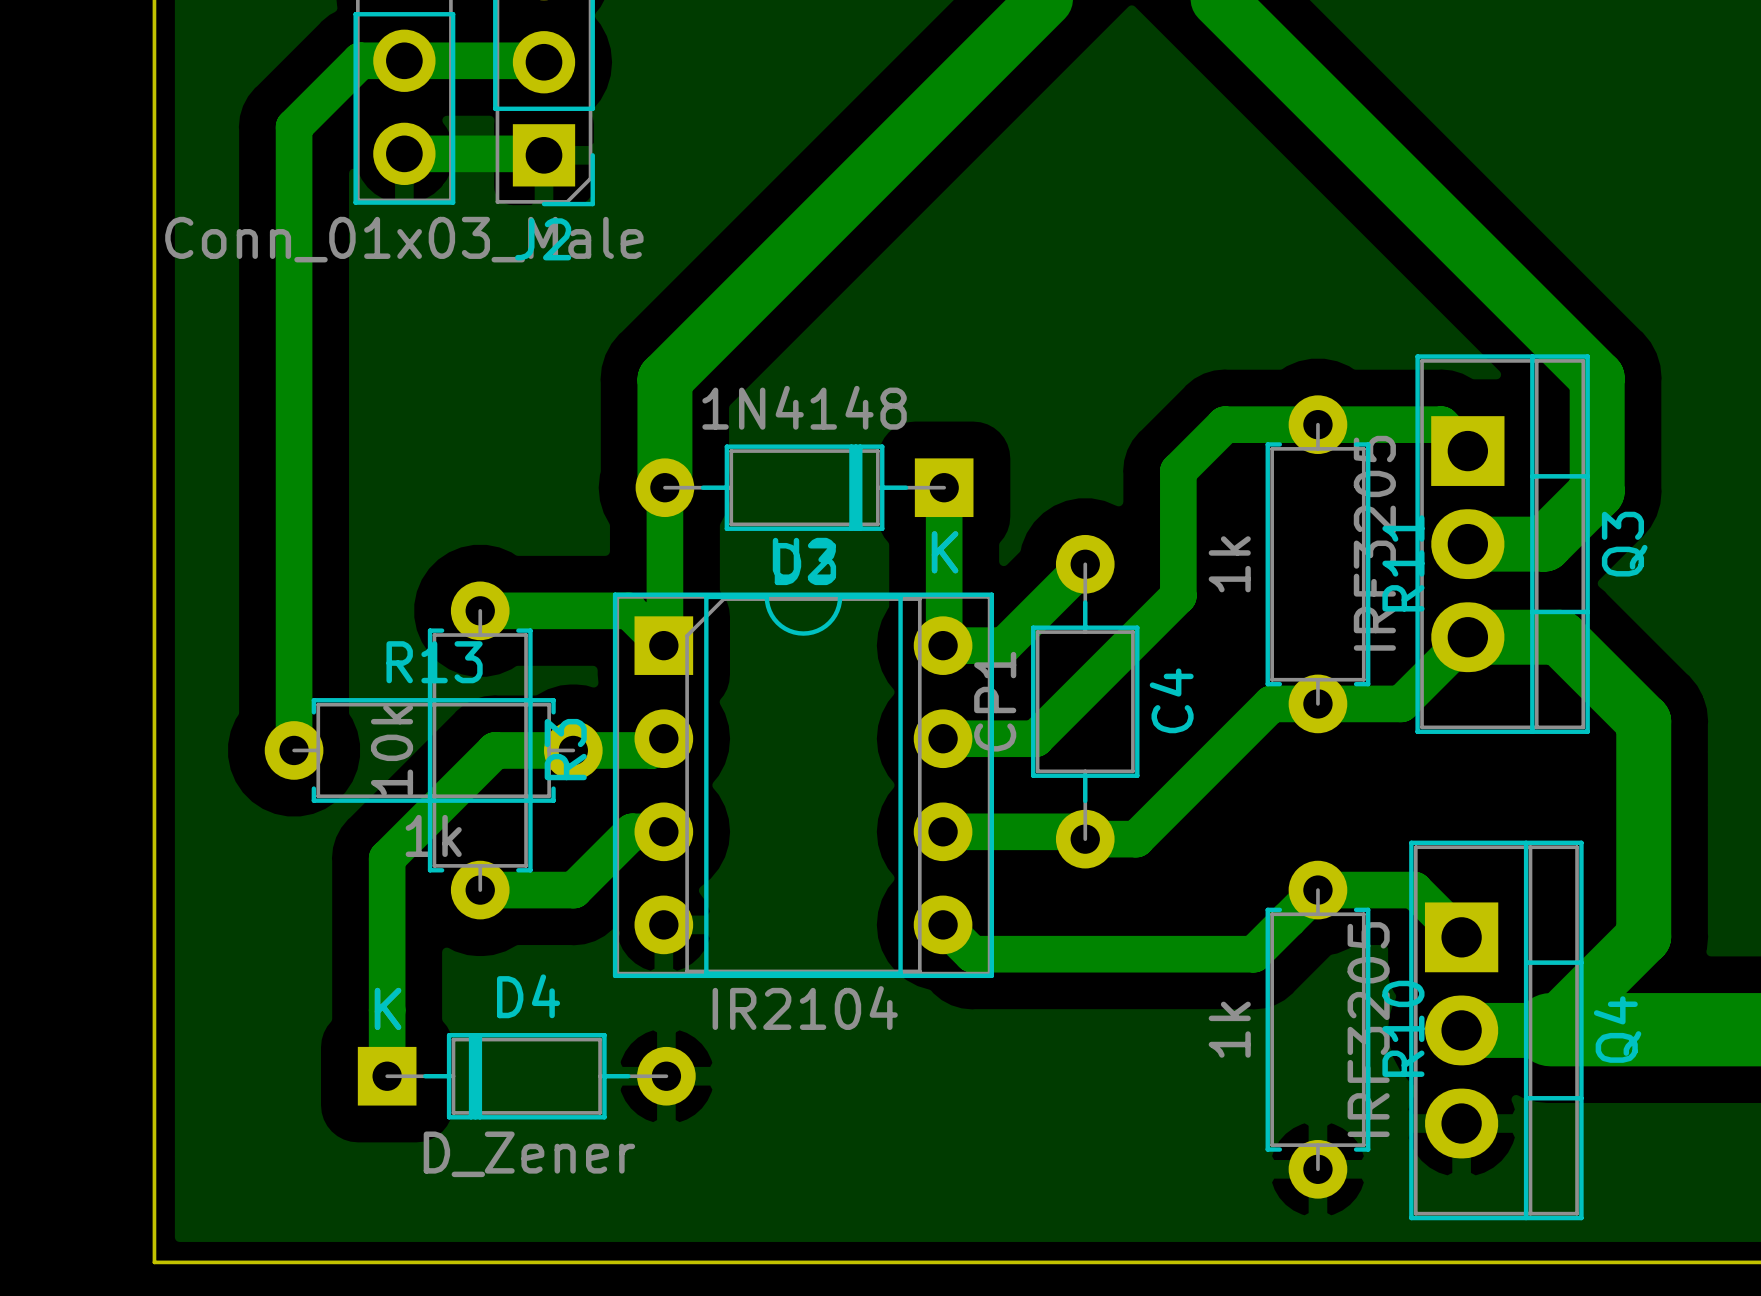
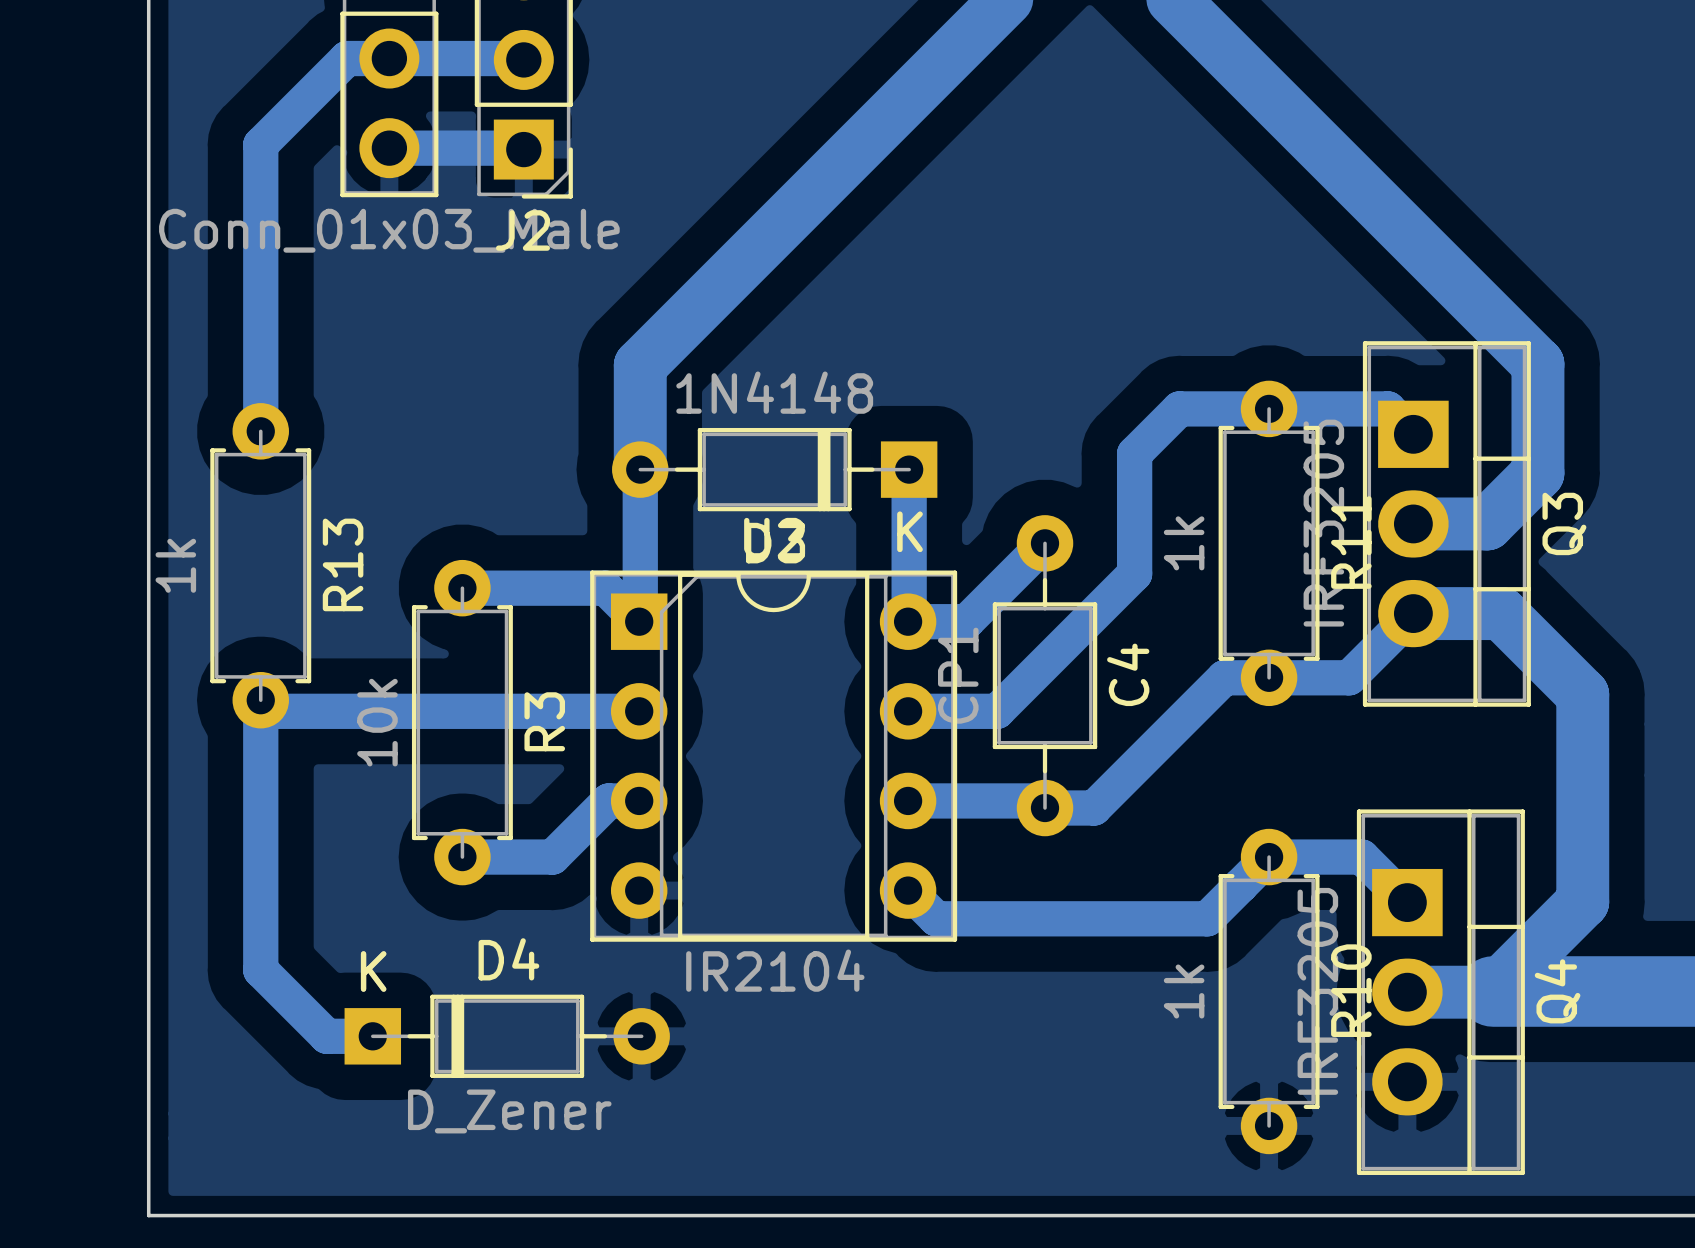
bottom track: (294, 127) (294, 750) -> (283, 122) (260, 144) (260, 431)
bottom track: (663, 738) (652, 750) (495, 750) (387, 858) (387, 1076) -> (639, 711) (271, 711) (260, 700) (260, 970) (326, 1036) (372, 1036)
R13 rotation: 0° (433, 750) -> 90° clockwise (260, 565)
R13 position: (433, 750) -> (260, 565)

